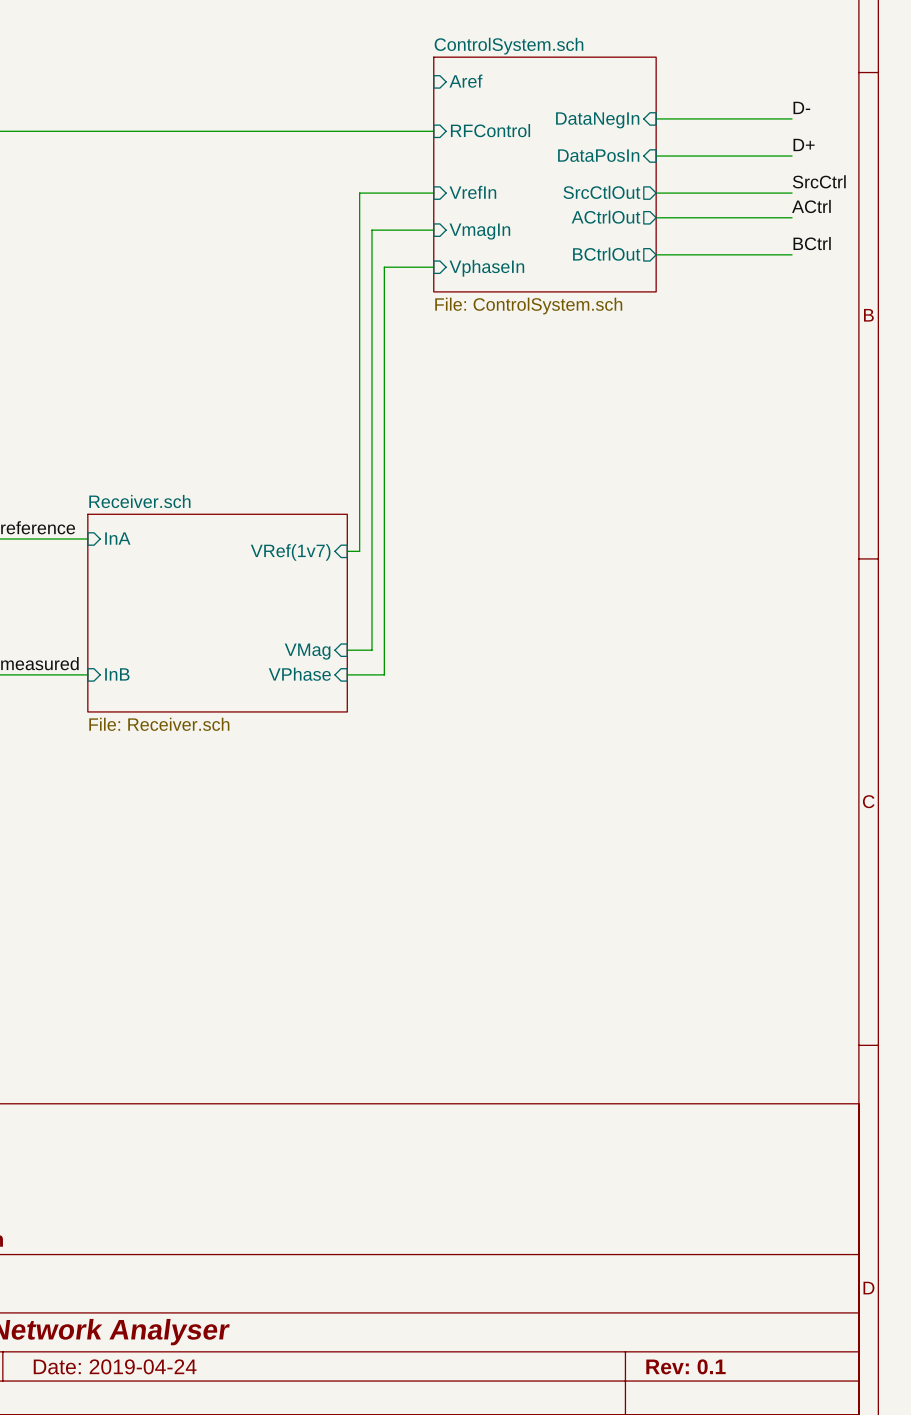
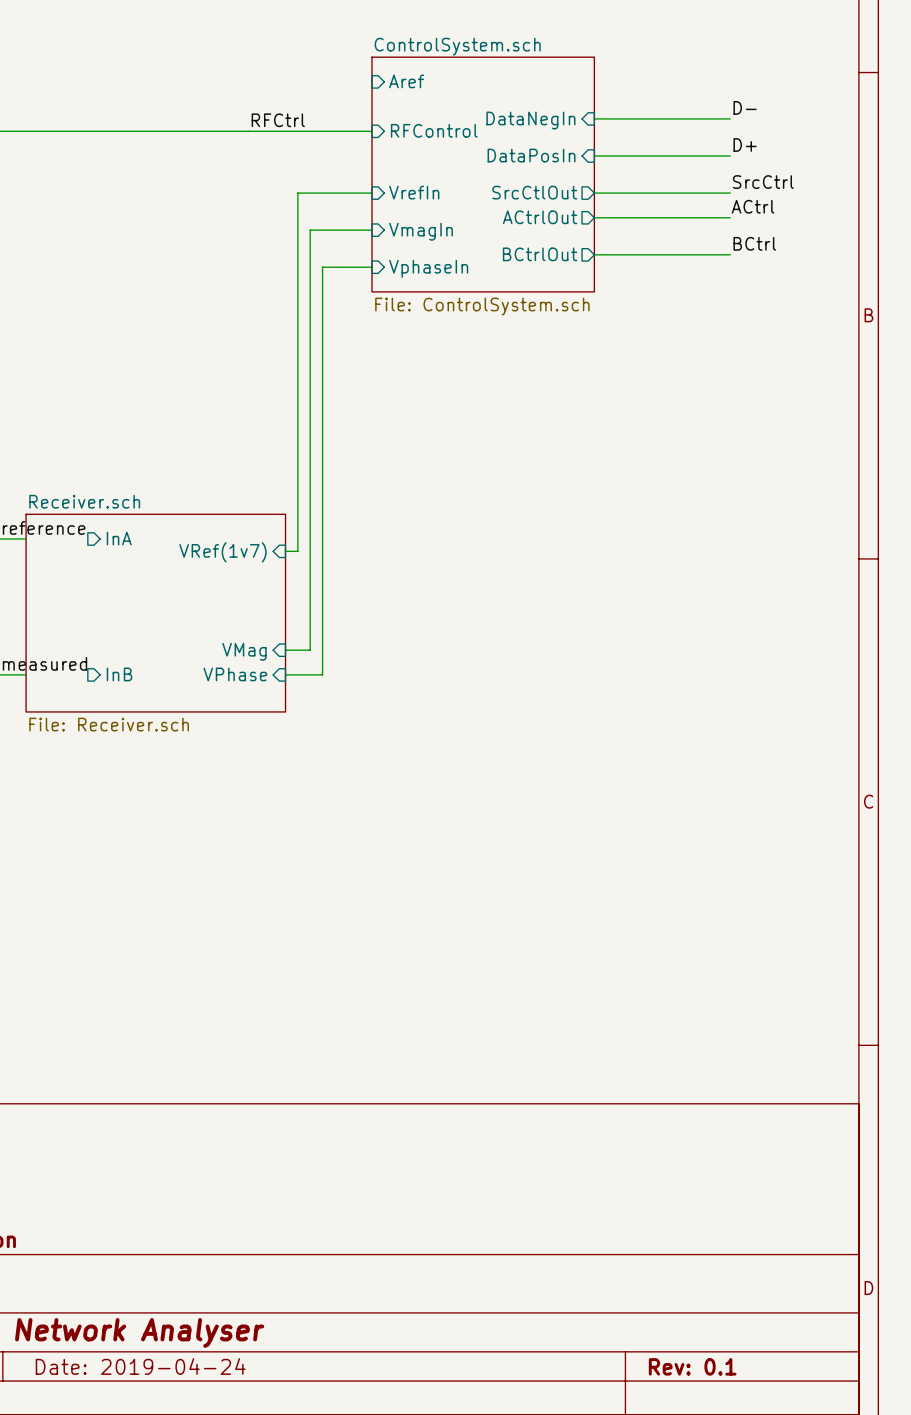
sheet pin position: Aref (465, 81) -> Aref (406, 81)
label position: D- (801, 107) -> D- (745, 107)
wire: (730, 118) (792, 118) -> (594, 118) (656, 118)
label: none -> RFCtrl (278, 120)
sheet pin position: DataNegIn (597, 120) -> DataNegIn (530, 120)
sheet pin position: RFControl (490, 130) -> RFControl (434, 130)
wire: (372, 131) (433, 131) -> none
label position: D+ (804, 144) -> D+ (745, 144)
sheet pin position: DataPosIn (598, 155) -> DataPosIn (531, 155)
wire: (730, 156) (792, 156) -> (594, 156) (656, 156)
sheet ControlSystem.sch position: (544, 174) -> (483, 174)
label position: SrcCtrl (819, 181) -> SrcCtrl (763, 182)
sheet pin position: VrefIn (472, 192) -> VrefIn (414, 192)
sheet pin position: SrcCtlOut (601, 192) -> SrcCtlOut (534, 192)
wire: (359, 193) (359, 551) (347, 551) -> (359, 193) (297, 193) (297, 551) (285, 551)
wire: (372, 193) (433, 193) -> none
wire: (730, 193) (792, 193) -> (594, 193) (656, 193)
label position: ACtrl (811, 206) -> ACtrl (753, 206)
sheet pin position: ACtrlOut (605, 217) -> ACtrlOut (540, 217)
wire: (730, 217) (792, 217) -> (594, 217) (656, 217)
wire: (433, 230) (372, 230) (372, 650) (347, 650) -> (372, 230) (310, 230) (310, 650) (285, 650)
sheet pin position: VmagIn (479, 231) -> VmagIn (421, 231)
label position: BCtrl (812, 243) -> BCtrl (754, 243)
sheet pin position: BCtrlOut (606, 254) -> BCtrlOut (540, 254)
wire: (730, 254) (792, 254) -> (594, 254) (656, 254)
wire: (433, 267) (384, 267) (384, 674) (347, 674) -> (372, 267) (322, 267) (322, 674) (285, 674)
sheet pin position: VphaseIn (486, 268) -> VphaseIn (428, 268)
wire: (26, 539) (87, 539) -> none
sheet pin position: VRef(1v7) (290, 552) -> VRef(1v7) (222, 552)
sheet Receiver.sch position: (217, 613) -> (155, 613)
sheet pin position: VMag (307, 651) -> VMag (244, 651)
wire: (26, 674) (87, 674) -> none
sheet pin position: VPhase (299, 674) -> VPhase (235, 674)

